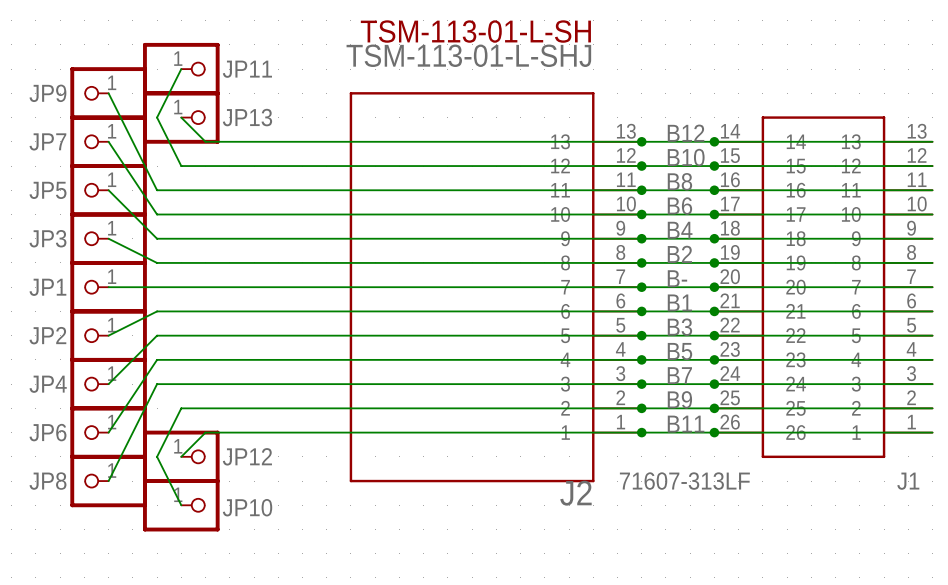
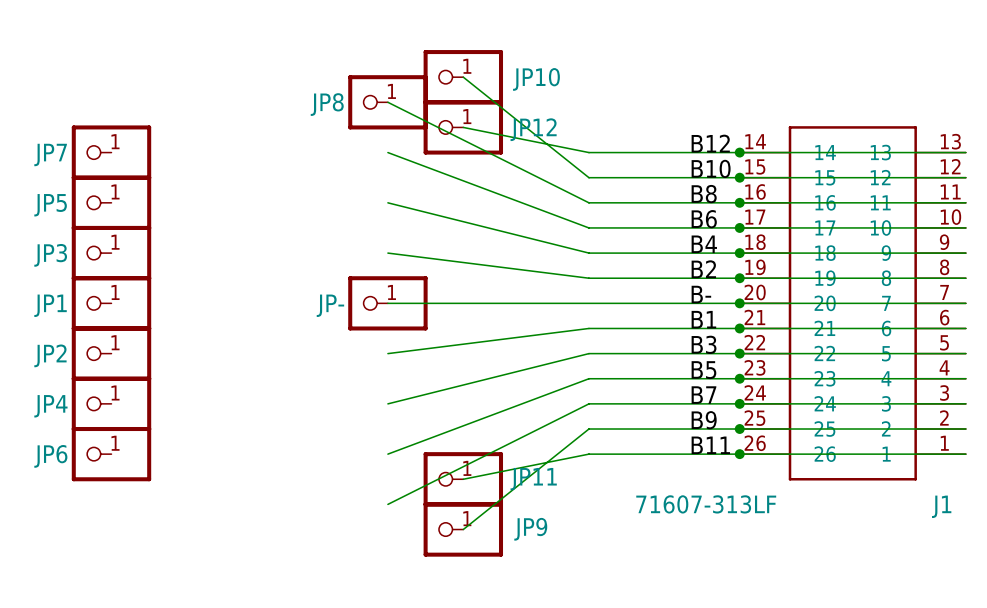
wire: (181, 69) (157, 117) (181, 166) (569, 166) -> (463, 77) (588, 177)
JP11 rotation: 0° (181, 69) -> 180° (463, 479)
JP11 position: (181, 69) -> (463, 479)
JP9 name position: JP9 (47, 93) -> JP9 (530, 529)
wire: (108, 93) (157, 190) (569, 190) -> (387, 102) (588, 202)
JP9 position: (108, 93) -> (463, 529)
wire: (181, 117) (205, 141) (569, 141) -> (463, 127) (588, 152)
JP13: (181, 117) -> none
wire: (108, 141) (157, 214) (569, 214) -> (387, 152) (588, 227)
junction: (641, 141) -> none
junction: (641, 166) -> none
wire: (108, 190) (157, 238) (569, 238) -> (387, 202) (588, 253)
junction: (641, 190) -> none
junction: (641, 214) -> none
wire: (108, 238) (157, 262) (569, 262) -> (387, 253) (588, 278)
junction: (641, 238) -> none
junction: (641, 262) -> none
wire: (108, 287) (375, 287) -> none
JP-: none -> (387, 303)
J2: TSM-113-01-L-SHJ (495, 287) -> none
junction: (641, 287) -> none
wire: (569, 311) (157, 311) (108, 335) -> (588, 328) (387, 353)
junction: (641, 311) -> none
wire: (569, 335) (157, 335) (108, 384) -> (588, 353) (387, 403)
junction: (641, 335) -> none
wire: (569, 359) (157, 359) (108, 432) -> (588, 378) (387, 454)
junction: (641, 359) -> none
wire: (569, 384) (157, 384) (108, 481) -> (588, 403) (387, 504)
junction: (641, 384) -> none
wire: (569, 408) (181, 408) (157, 456) (181, 505) -> (588, 429) (463, 529)
junction: (641, 408) -> none
wire: (569, 432) (205, 432) (181, 456) -> (588, 454) (463, 479)
junction: (641, 432) -> none
JP12 rotation: 0° (181, 456) -> 180° (463, 127)
JP12 position: (181, 456) -> (463, 127)
JP8 position: (108, 481) -> (387, 102)
JP10 rotation: 0° (181, 505) -> 180° (463, 77)
JP10 position: (181, 505) -> (463, 77)

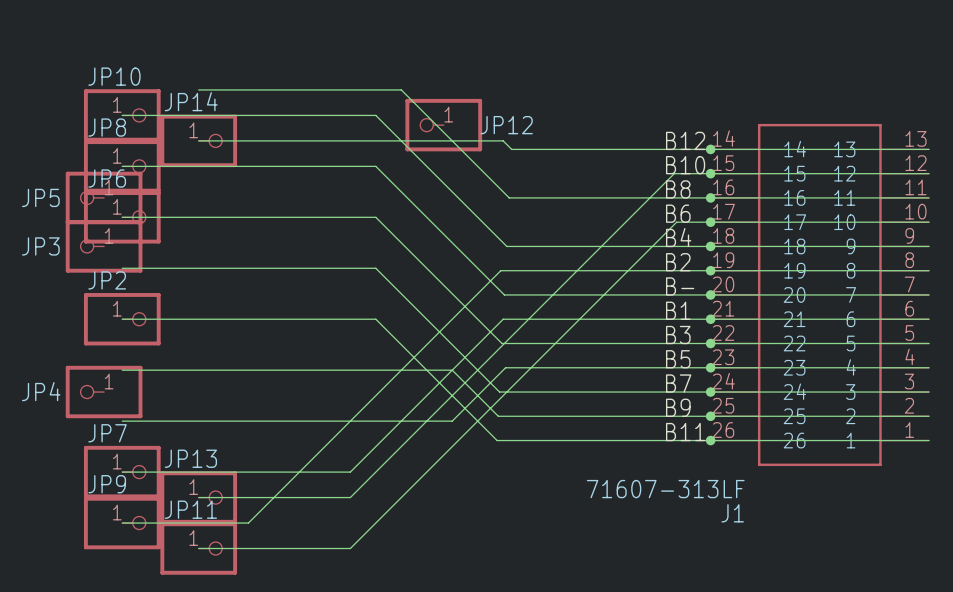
wire: (463, 77) (588, 177) (702, 177) -> (198, 497) (350, 497) (674, 173)
JP10 rotation: 0° (463, 77) -> 180° (122, 115)
JP10 position: (463, 77) -> (122, 115)
JP10 name position: JP10 (536, 79) -> JP10 (114, 76)
wire: (387, 102) (588, 202) -> (198, 89) (401, 89) (509, 197) (565, 197)
JP8 rotation: 0° (387, 102) -> 180° (122, 166)
JP8 position: (387, 102) -> (122, 166)
JP8 name position: JP8 (327, 104) -> JP8 (107, 127)
wire: (463, 127) (588, 152) -> (198, 140) (503, 140) (511, 149) (565, 149)
JP14: none -> (198, 140)
JP7 rotation: 0° (111, 152) -> 180° (122, 472)
JP7 position: (111, 152) -> (122, 472)
wire: (387, 152) (588, 227) (704, 227) -> (198, 548) (350, 548) (676, 222)
JP7 name position: JP7 (50, 154) -> JP7 (107, 433)
wire: (387, 202) (588, 253) -> (122, 115) (375, 115) (506, 246) (565, 246)
wire: (387, 253) (588, 278) -> (122, 523) (248, 523) (500, 270) (565, 270)
JP1: (111, 303) -> none
wire: (387, 303) (526, 303) -> (122, 166) (375, 166) (504, 294)
JP-: (387, 303) -> none
wire: (588, 328) (387, 353) -> (565, 319) (503, 319) (350, 472) (122, 472)
JP2 rotation: 0° (111, 353) -> 180° (122, 319)
wire: (588, 353) (387, 403) -> (565, 343) (501, 343) (375, 217) (122, 217)
JP2 name position: JP2 (50, 355) -> JP2 (107, 280)
wire: (588, 378) (387, 454) -> (565, 367) (505, 367) (452, 421) (122, 421)
wire: (588, 403) (387, 504) -> (565, 392) (499, 392) (375, 268) (122, 268)
wire: (588, 429) (463, 529) -> (565, 416) (498, 416) (452, 370) (122, 370)
JP6 rotation: 0° (111, 454) -> 180° (122, 217)
JP6 position: (111, 454) -> (122, 217)
wire: (588, 454) (463, 479) -> (565, 440) (497, 440) (375, 319) (122, 319)
JP6 name position: JP6 (50, 456) -> JP6 (107, 178)
JP11 rotation: 0° (463, 479) -> 180° (198, 548)
JP11 position: (463, 479) -> (198, 548)
JP11 name position: JP11 (533, 479) -> JP11 (190, 509)
J1 name position: J1 (941, 506) -> J1 (732, 513)
JP13: none -> (198, 497)
JP9 rotation: 0° (463, 529) -> 180° (122, 523)
JP9 position: (463, 529) -> (122, 523)
JP9 name position: JP9 (530, 529) -> JP9 (107, 484)

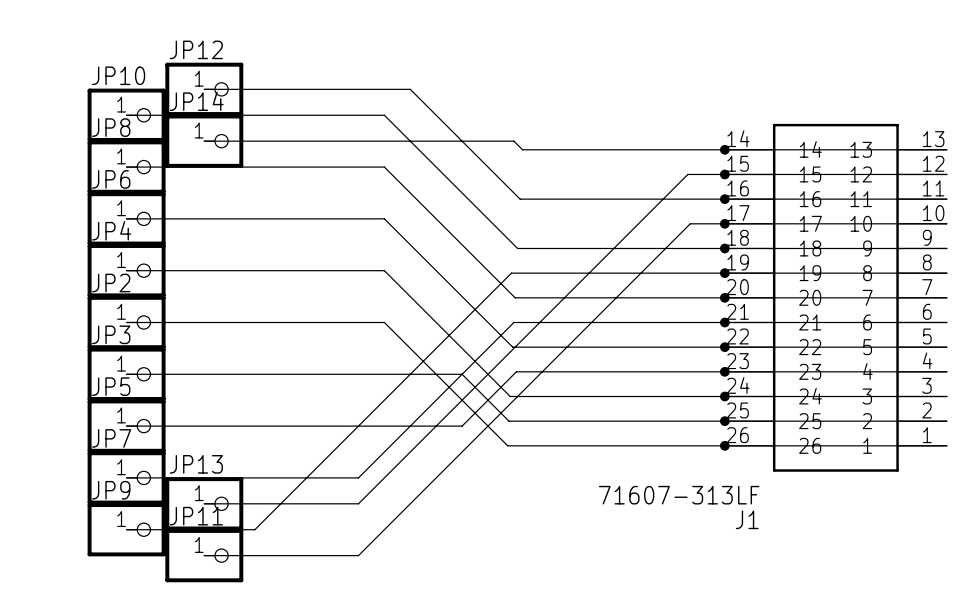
JP12 rotation: 0° (443, 125) -> 180° (204, 89)
JP12 position: (443, 125) -> (204, 89)
JP12 name position: JP12 (506, 125) -> JP12 (196, 49)
label: B12 (685, 140) -> none
label: B10 (685, 165) -> none
label: B8 (678, 189) -> none
JP5 name position: JP5 (40, 197) -> JP5 (111, 386)
JP5 rotation: 0° (104, 197) -> 180° (126, 426)
JP5 position: (104, 197) -> (126, 426)
label: B6 (678, 213) -> none
label: B4 (678, 237) -> none
JP3 name position: JP3 (40, 246) -> JP3 (111, 334)
JP3 rotation: 0° (104, 246) -> 180° (126, 374)
JP3 position: (104, 246) -> (126, 374)
label: B2 (678, 262) -> none
label: B- (680, 286) -> none
label: B1 (678, 310) -> none
label: B3 (678, 335) -> none
label: B5 (678, 359) -> none
label: B7 (678, 383) -> none
JP4 name position: JP4 (41, 391) -> JP4 (111, 230)
JP4 rotation: 0° (104, 392) -> 180° (126, 270)
JP4 position: (104, 392) -> (126, 270)
label: B9 (678, 407) -> none
label: B11 (685, 432) -> none

